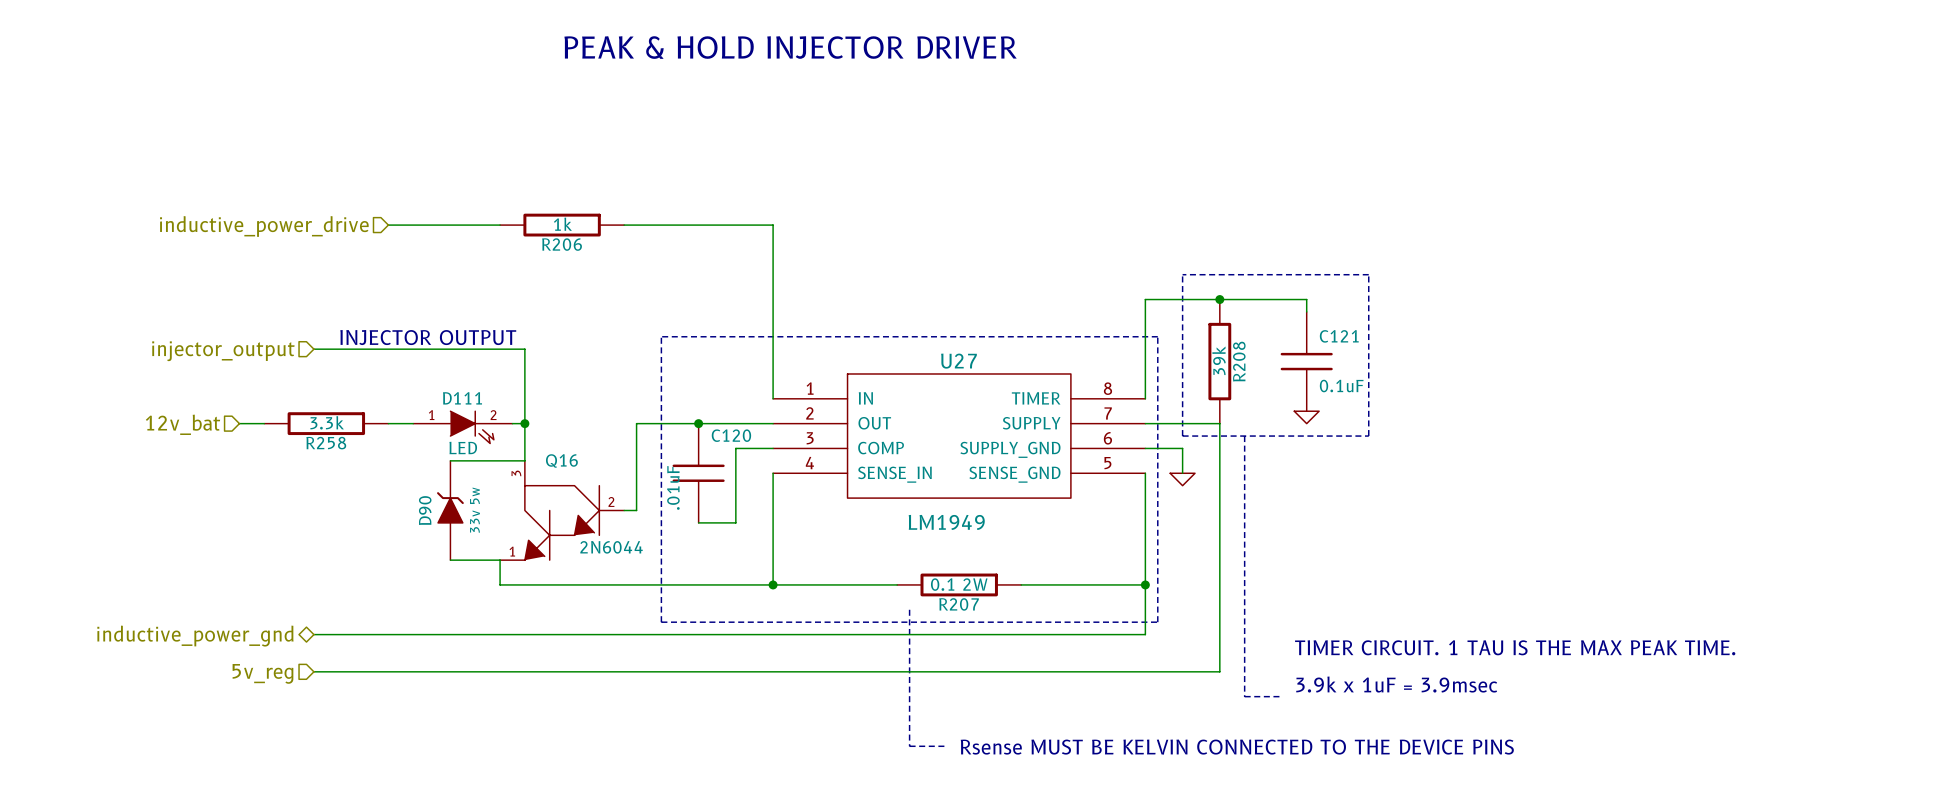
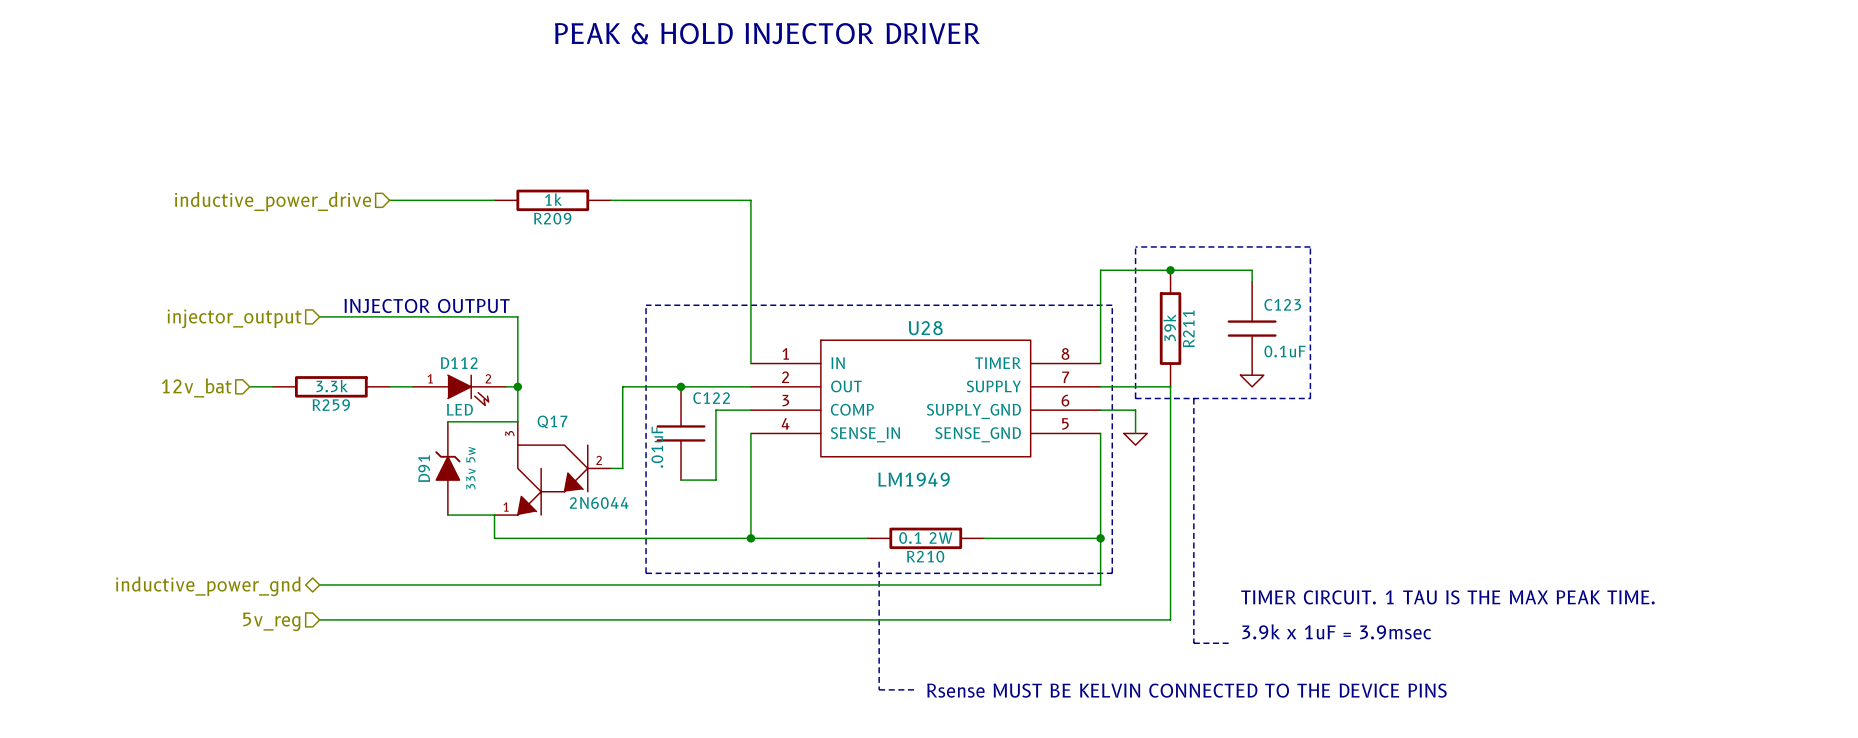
R206 name: R206 (562, 244) -> R209 (552, 218)
C121 name: C121 (1339, 336) -> C123 (1282, 304)
U27 name: U27 (958, 361) -> U28 (925, 328)
R208 name: R208 (1239, 361) -> R211 (1188, 328)
D111 name: D111 (462, 398) -> D112 (459, 363)
C120 name: C120 (731, 435) -> C122 (711, 398)
R258 name: R258 (326, 443) -> R259 (331, 405)
Q16 name: Q16 (561, 460) -> Q17 (552, 421)
D90 name: D90 (425, 510) -> D91 (424, 468)
R207 name: R207 (959, 604) -> R210 (925, 556)

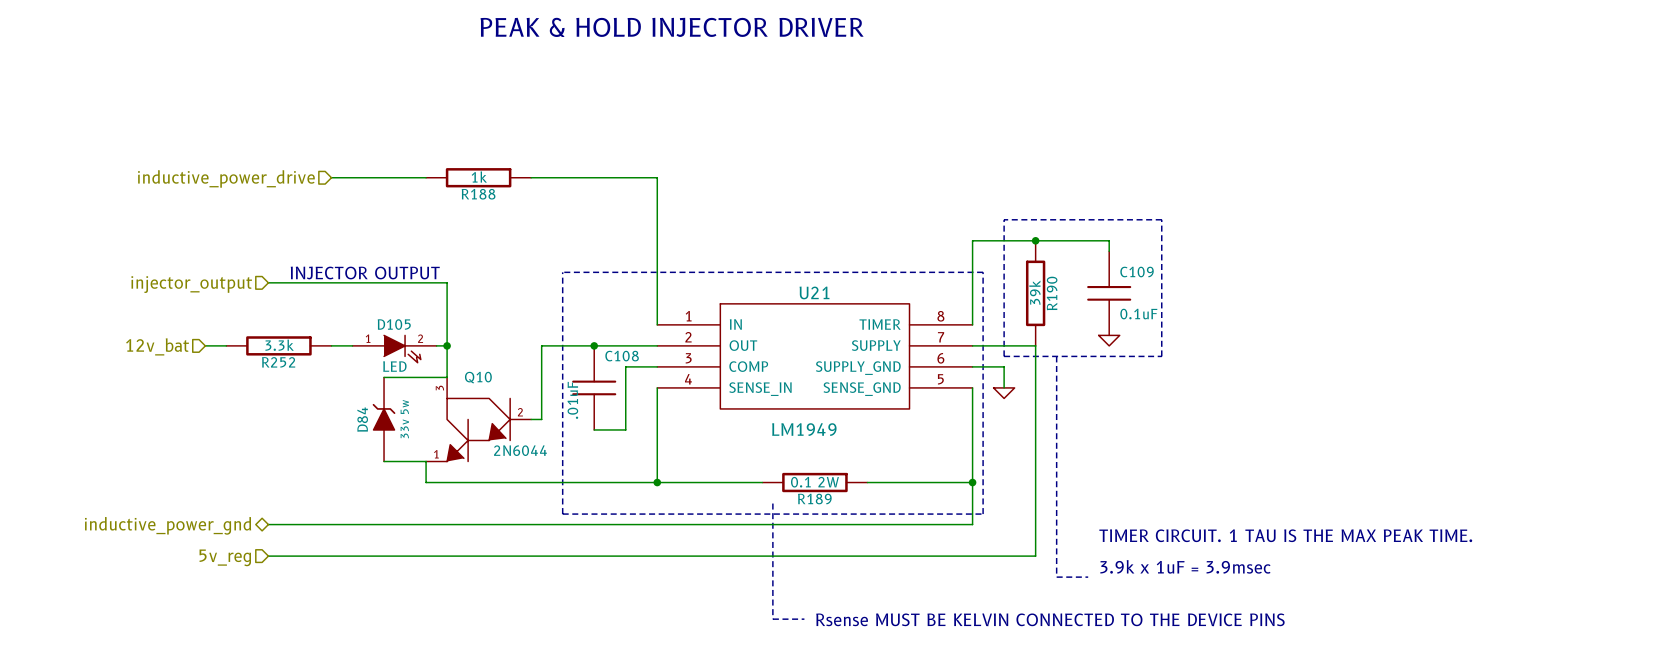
R209 name: R209 (552, 218) -> R188 (478, 194)
C123 name: C123 (1282, 304) -> C109 (1137, 272)
U28 name: U28 (925, 328) -> U21 (814, 292)
R211 name: R211 (1188, 328) -> R190 (1052, 293)
D112 name: D112 (459, 363) -> D105 (394, 324)
C122 name: C122 (711, 398) -> C108 (622, 356)
R259 name: R259 (331, 405) -> R252 (278, 362)
Q17 name: Q17 (552, 421) -> Q10 (478, 377)
D91 name: D91 (424, 468) -> D84 (362, 419)
R210 name: R210 (925, 556) -> R189 (814, 499)

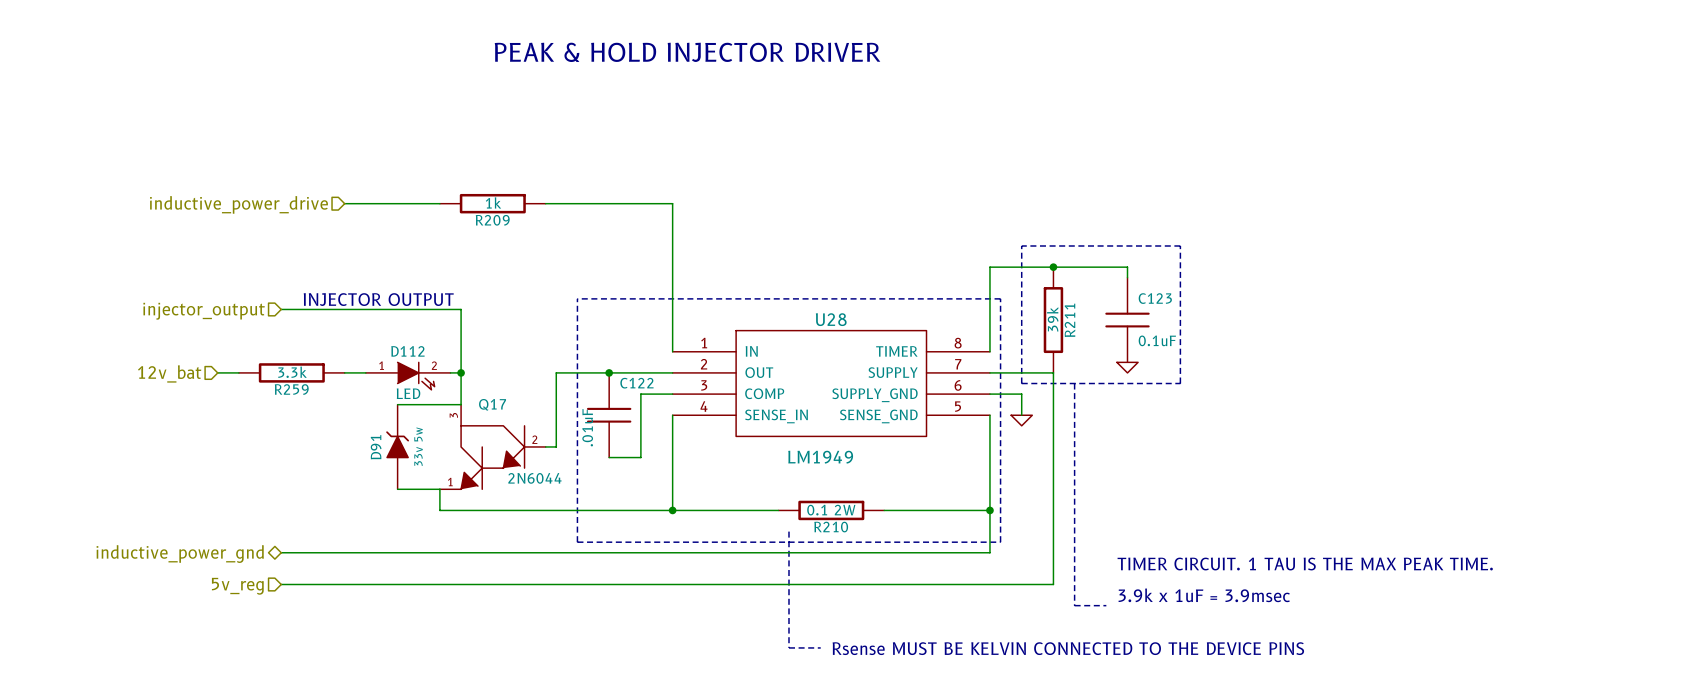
R188 name: R188 (478, 194) -> R209 (492, 220)
C109 name: C109 (1137, 272) -> C123 (1155, 298)
U21 name: U21 (814, 292) -> U28 (831, 319)
R190 name: R190 (1052, 293) -> R211 (1069, 320)
D105 name: D105 (394, 324) -> D112 (407, 351)
C108 name: C108 (622, 356) -> C122 (636, 383)
R252 name: R252 (278, 362) -> R259 (291, 389)
Q10 name: Q10 (478, 377) -> Q17 (492, 404)
D84 name: D84 (362, 419) -> D91 (376, 447)
R189 name: R189 (814, 499) -> R210 (831, 527)

